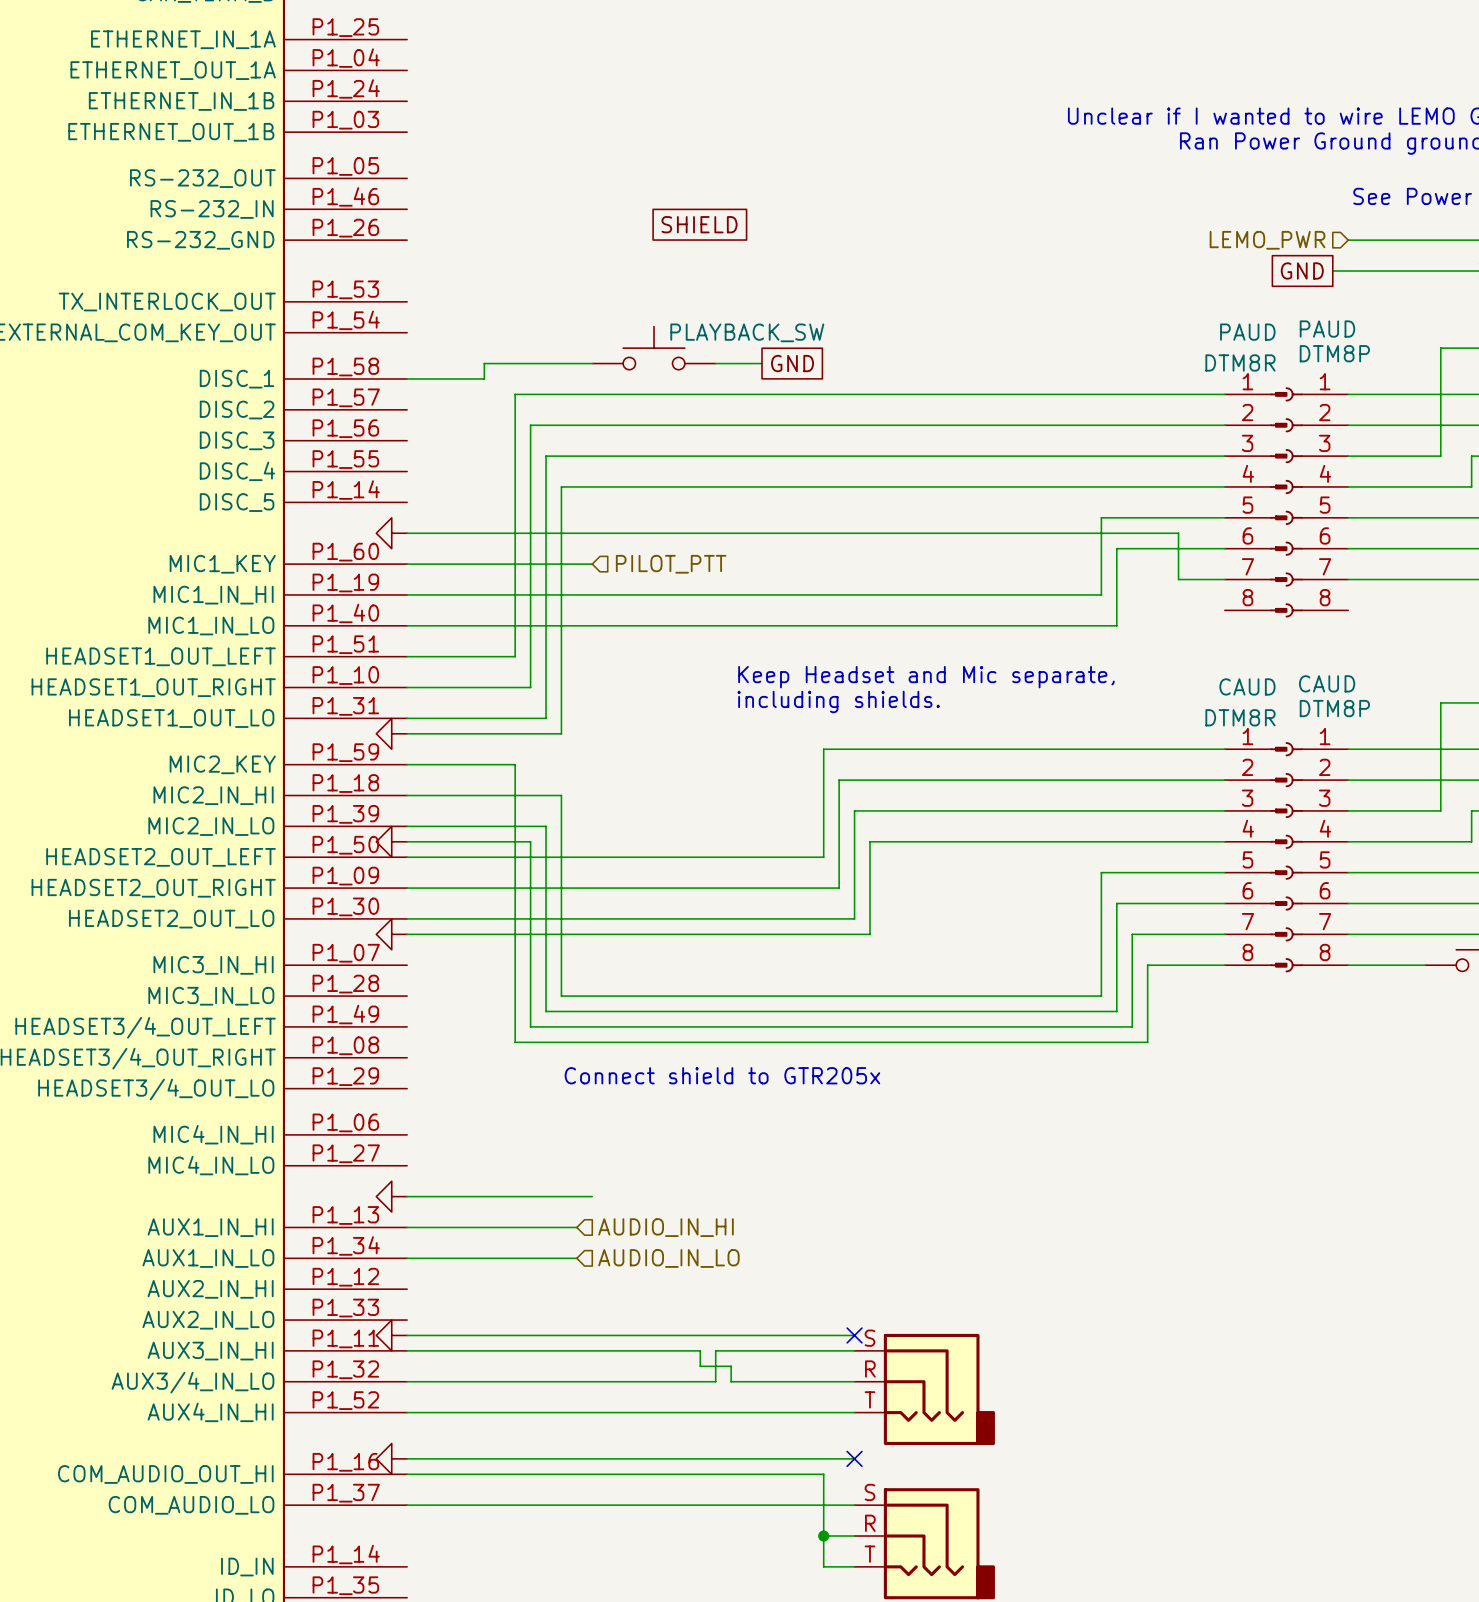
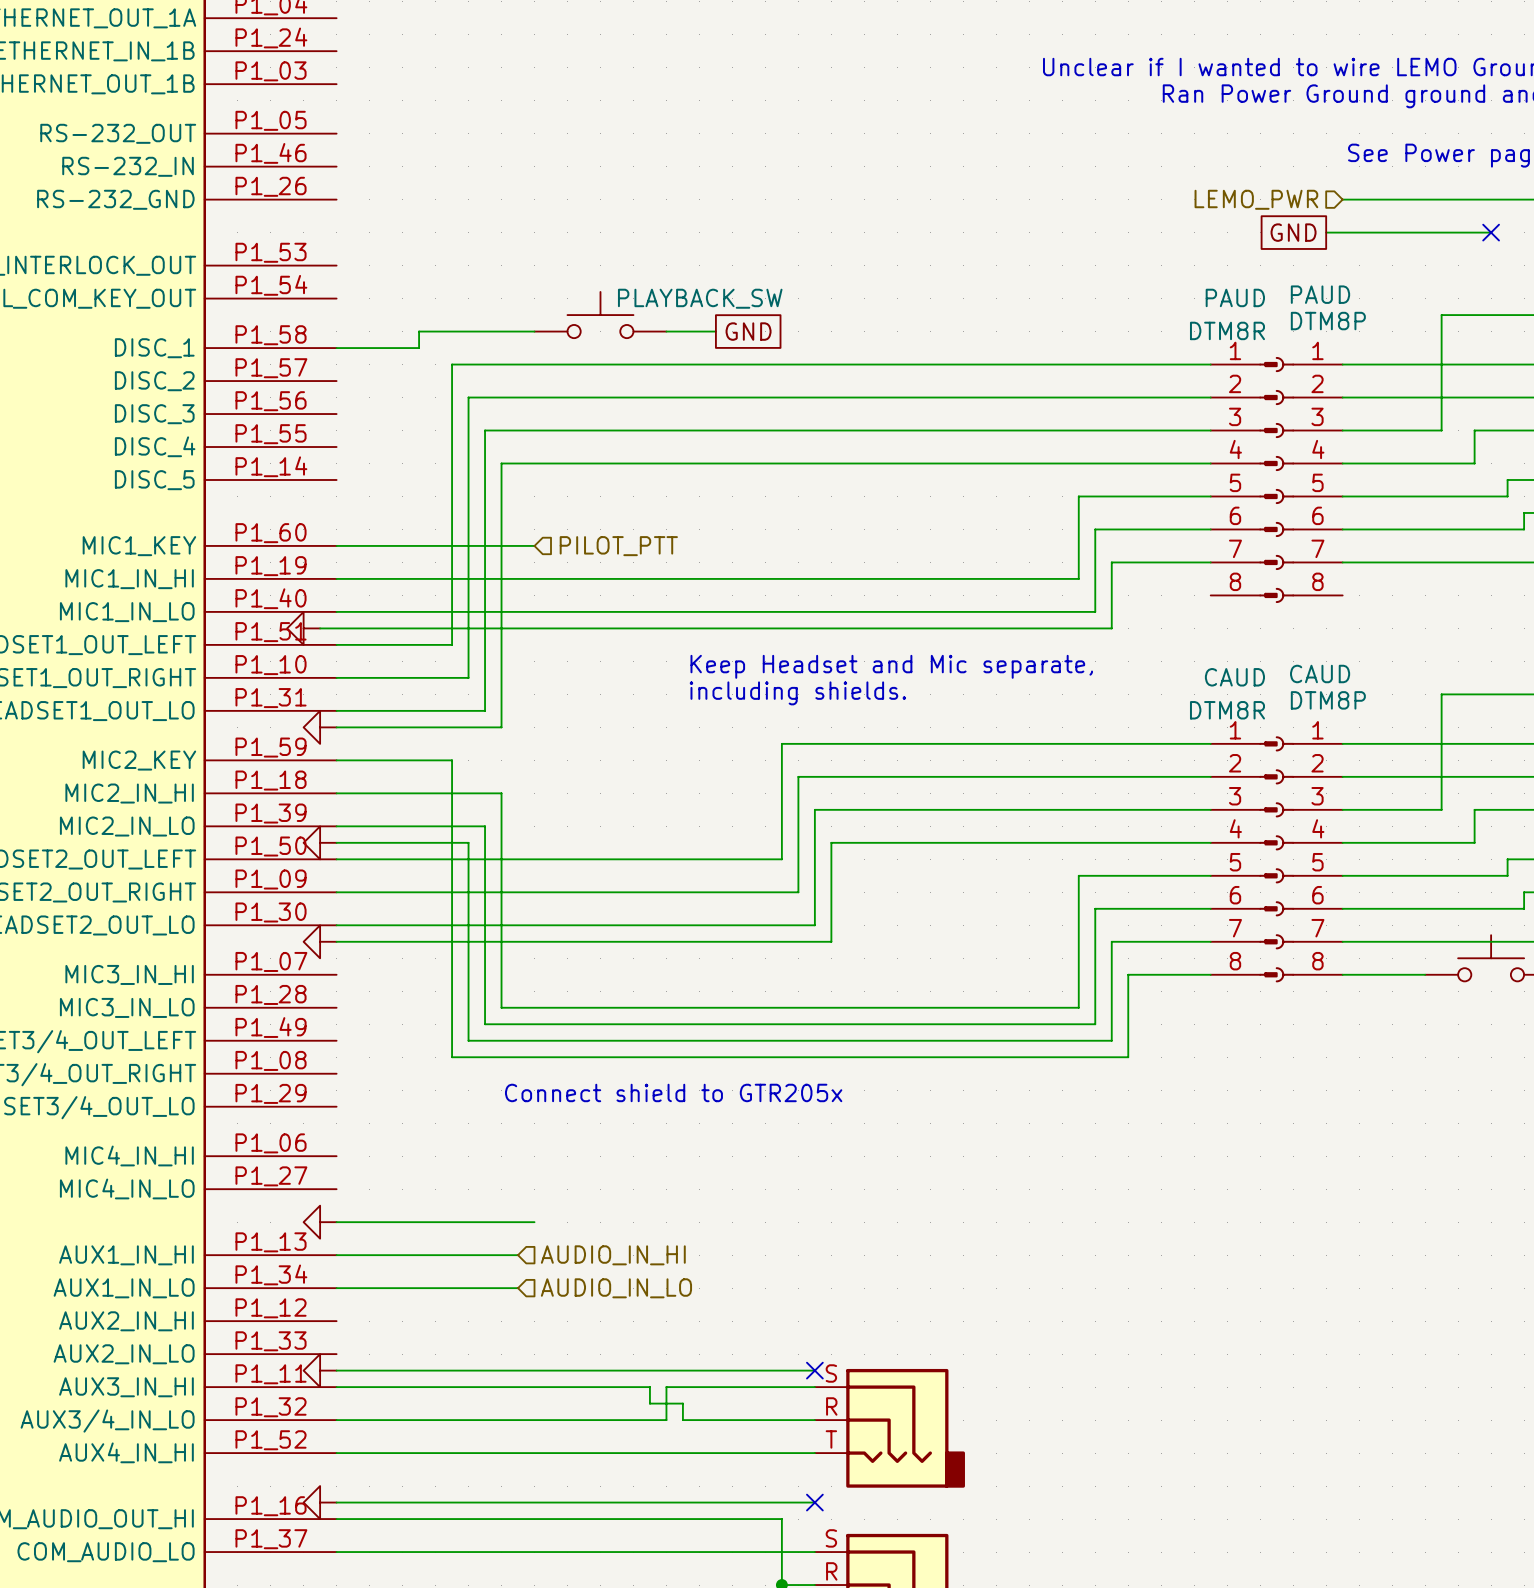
global label: SHIELD (699, 224) -> none
power symbol position: (391, 533) -> (303, 628)
wire: (407, 533) (1178, 533) (1178, 579) -> (320, 628) (1111, 628) (1111, 562) (1161, 562)

